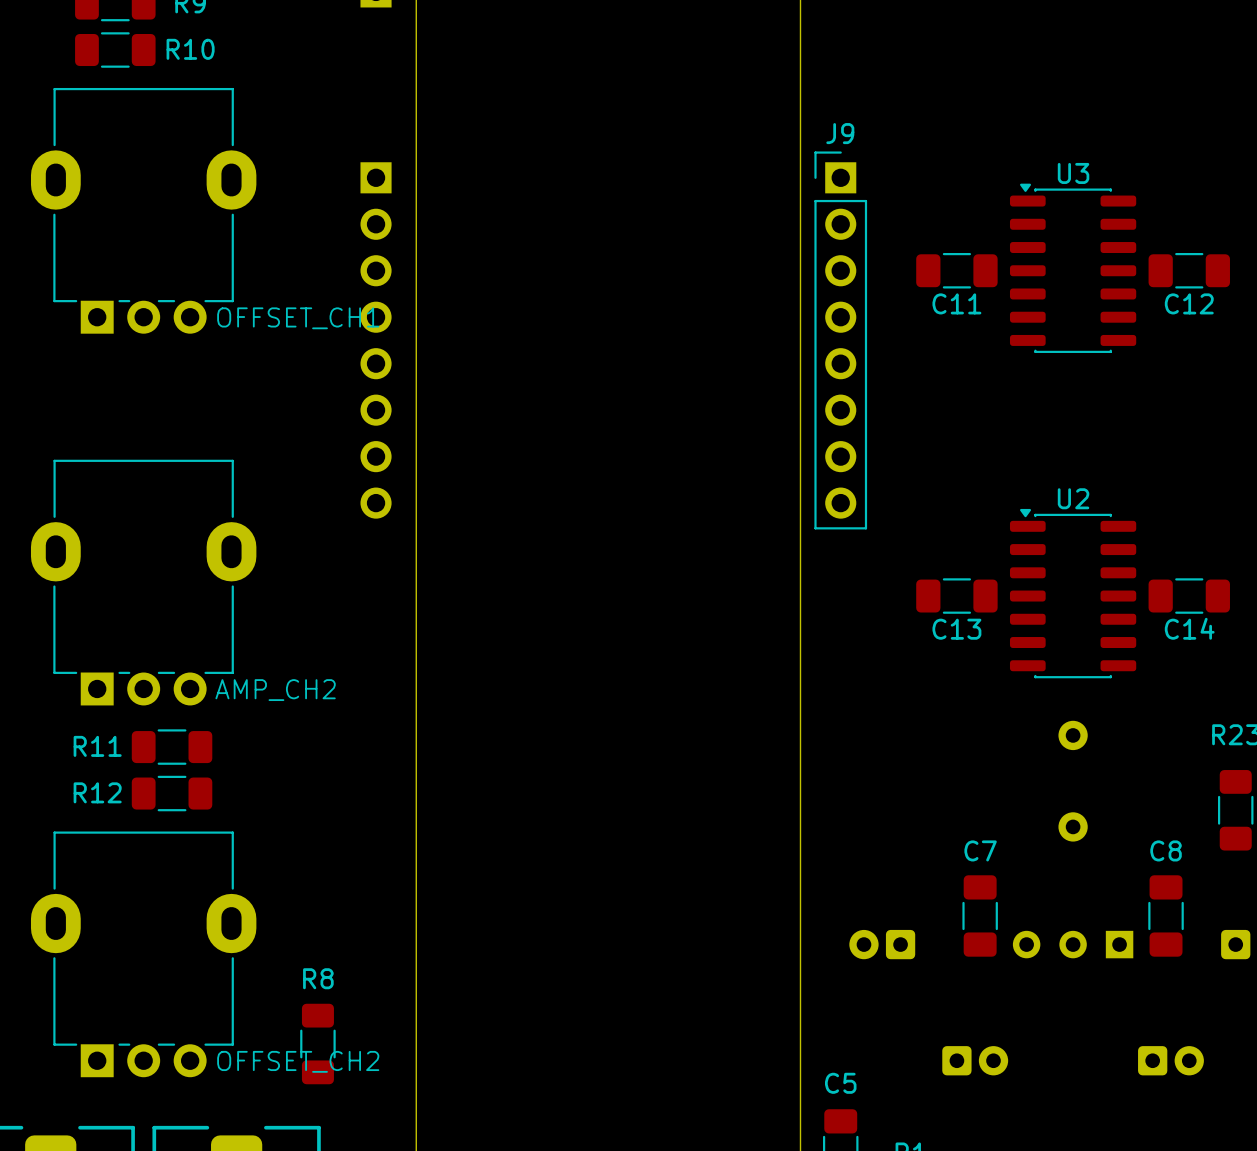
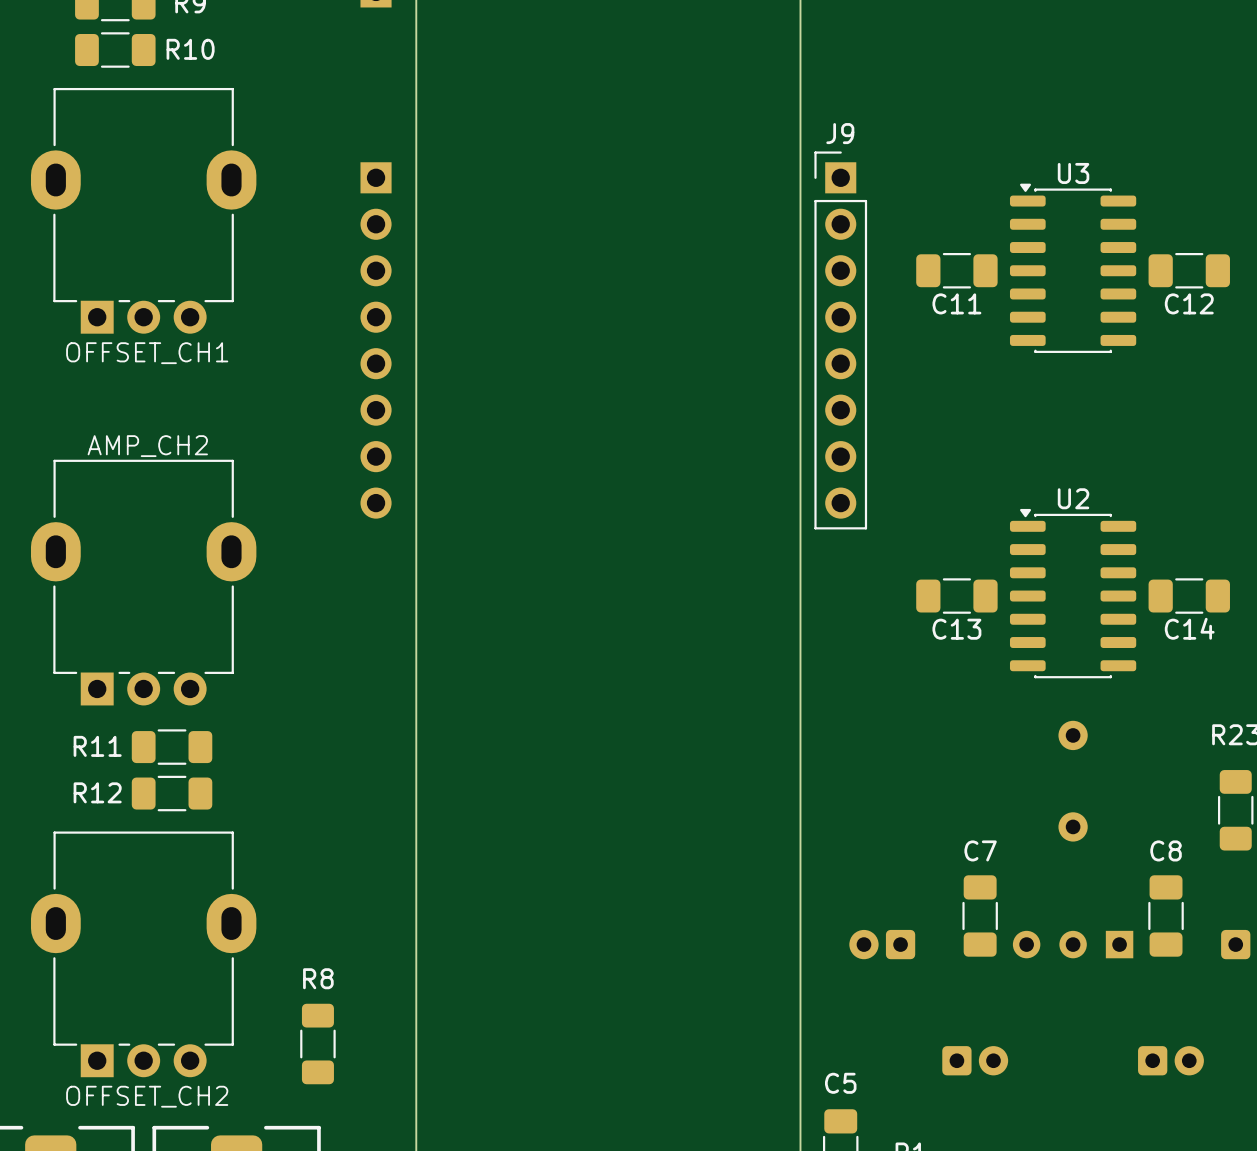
OFFSET_CH1 name position: OFFSET_CH1 (298, 318) -> OFFSET_CH1 (147, 353)
AMP_CH2 name position: AMP_CH2 (275, 690) -> AMP_CH2 (147, 446)
OFFSET_CH2 name position: OFFSET_CH2 (298, 1061) -> OFFSET_CH2 (147, 1096)

